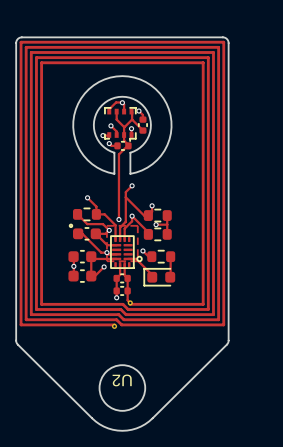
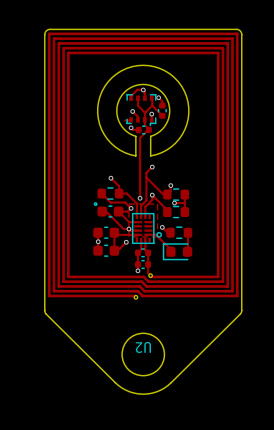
via: (102, 135) -> none

